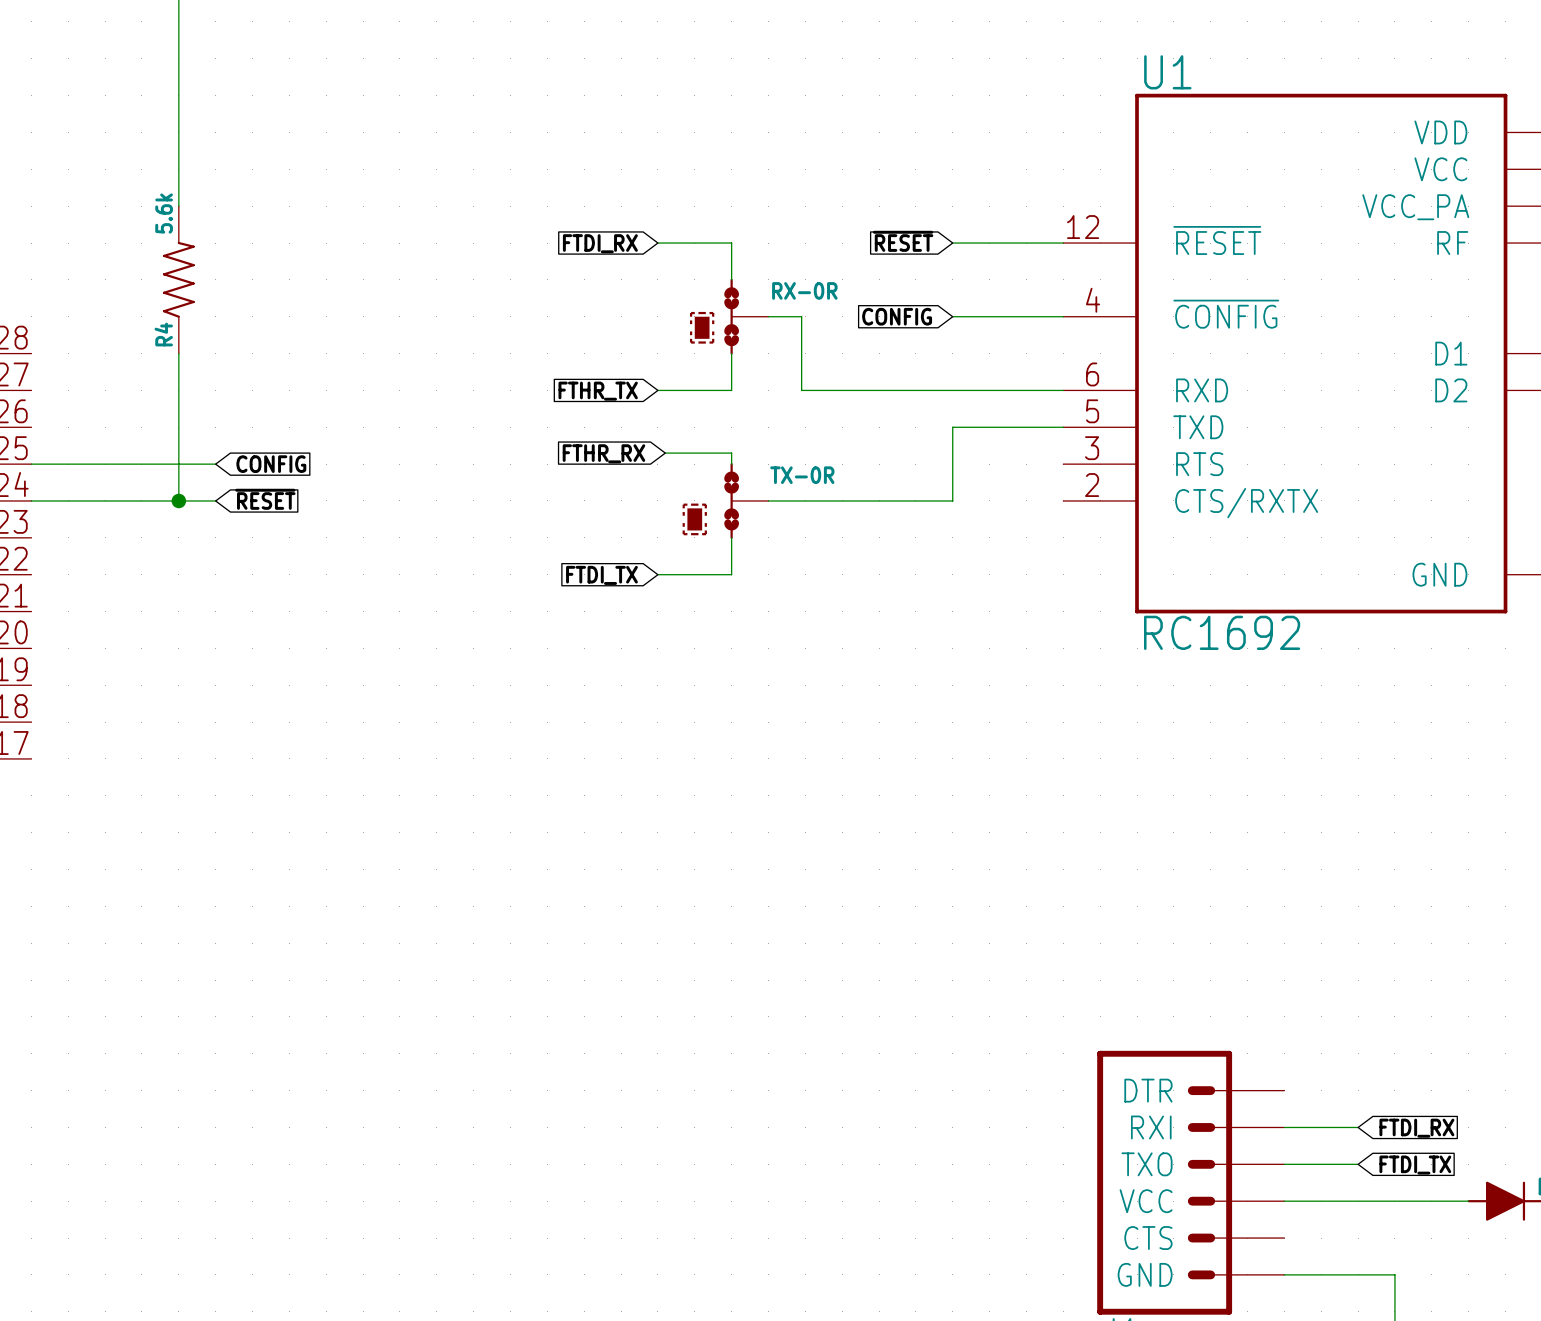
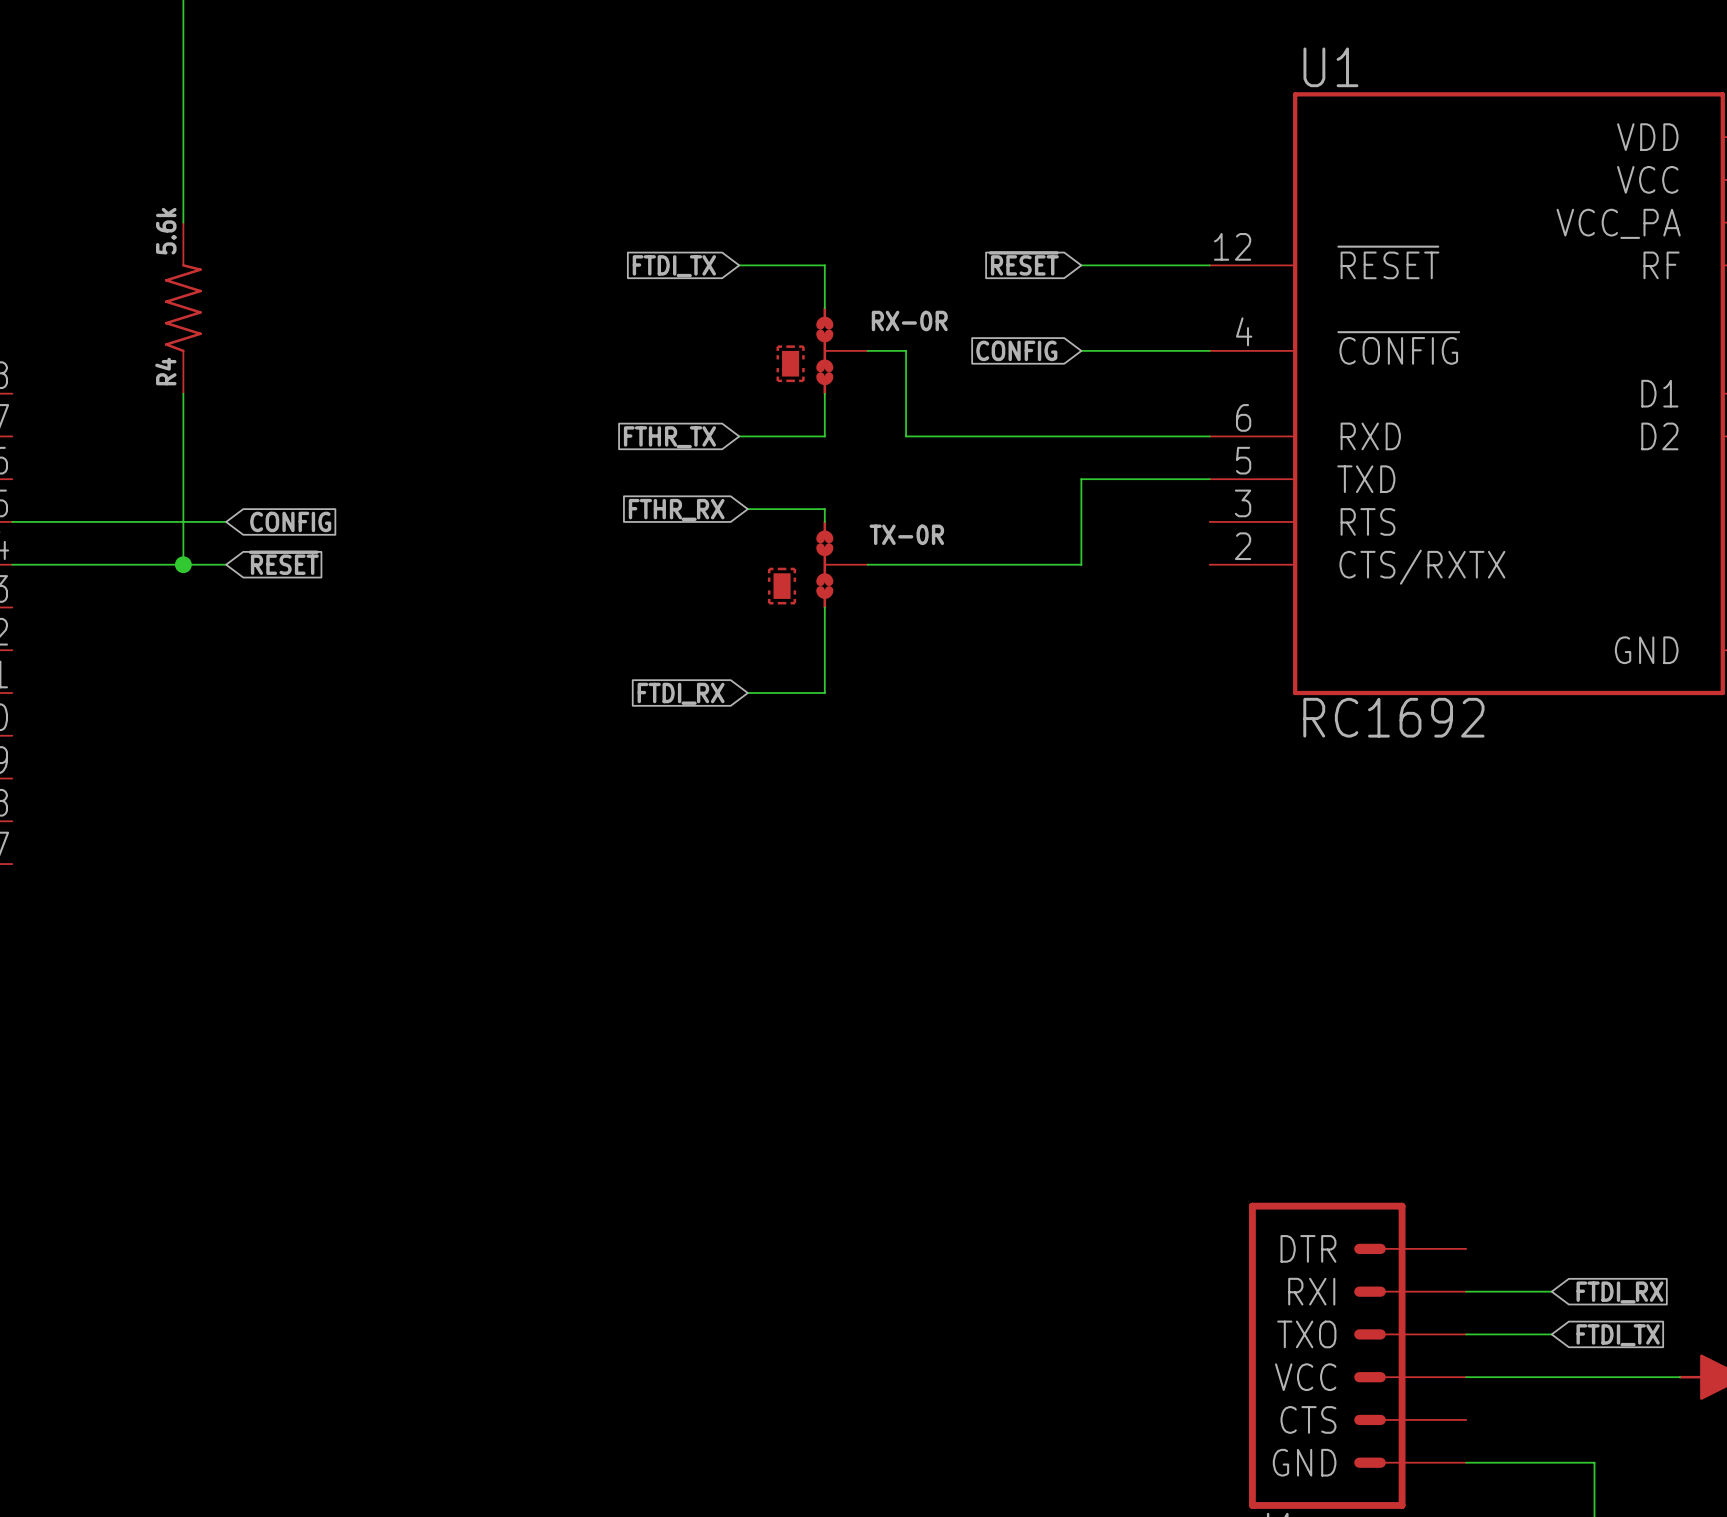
global label: FTDI_RX (600, 243) -> FTDI_TX (674, 266)
wire: (657, 574) (731, 574) -> (747, 693) (824, 693) (824, 650)
global label: FTDI_TX (601, 575) -> none
global label: none -> FTDI_RX (681, 693)

